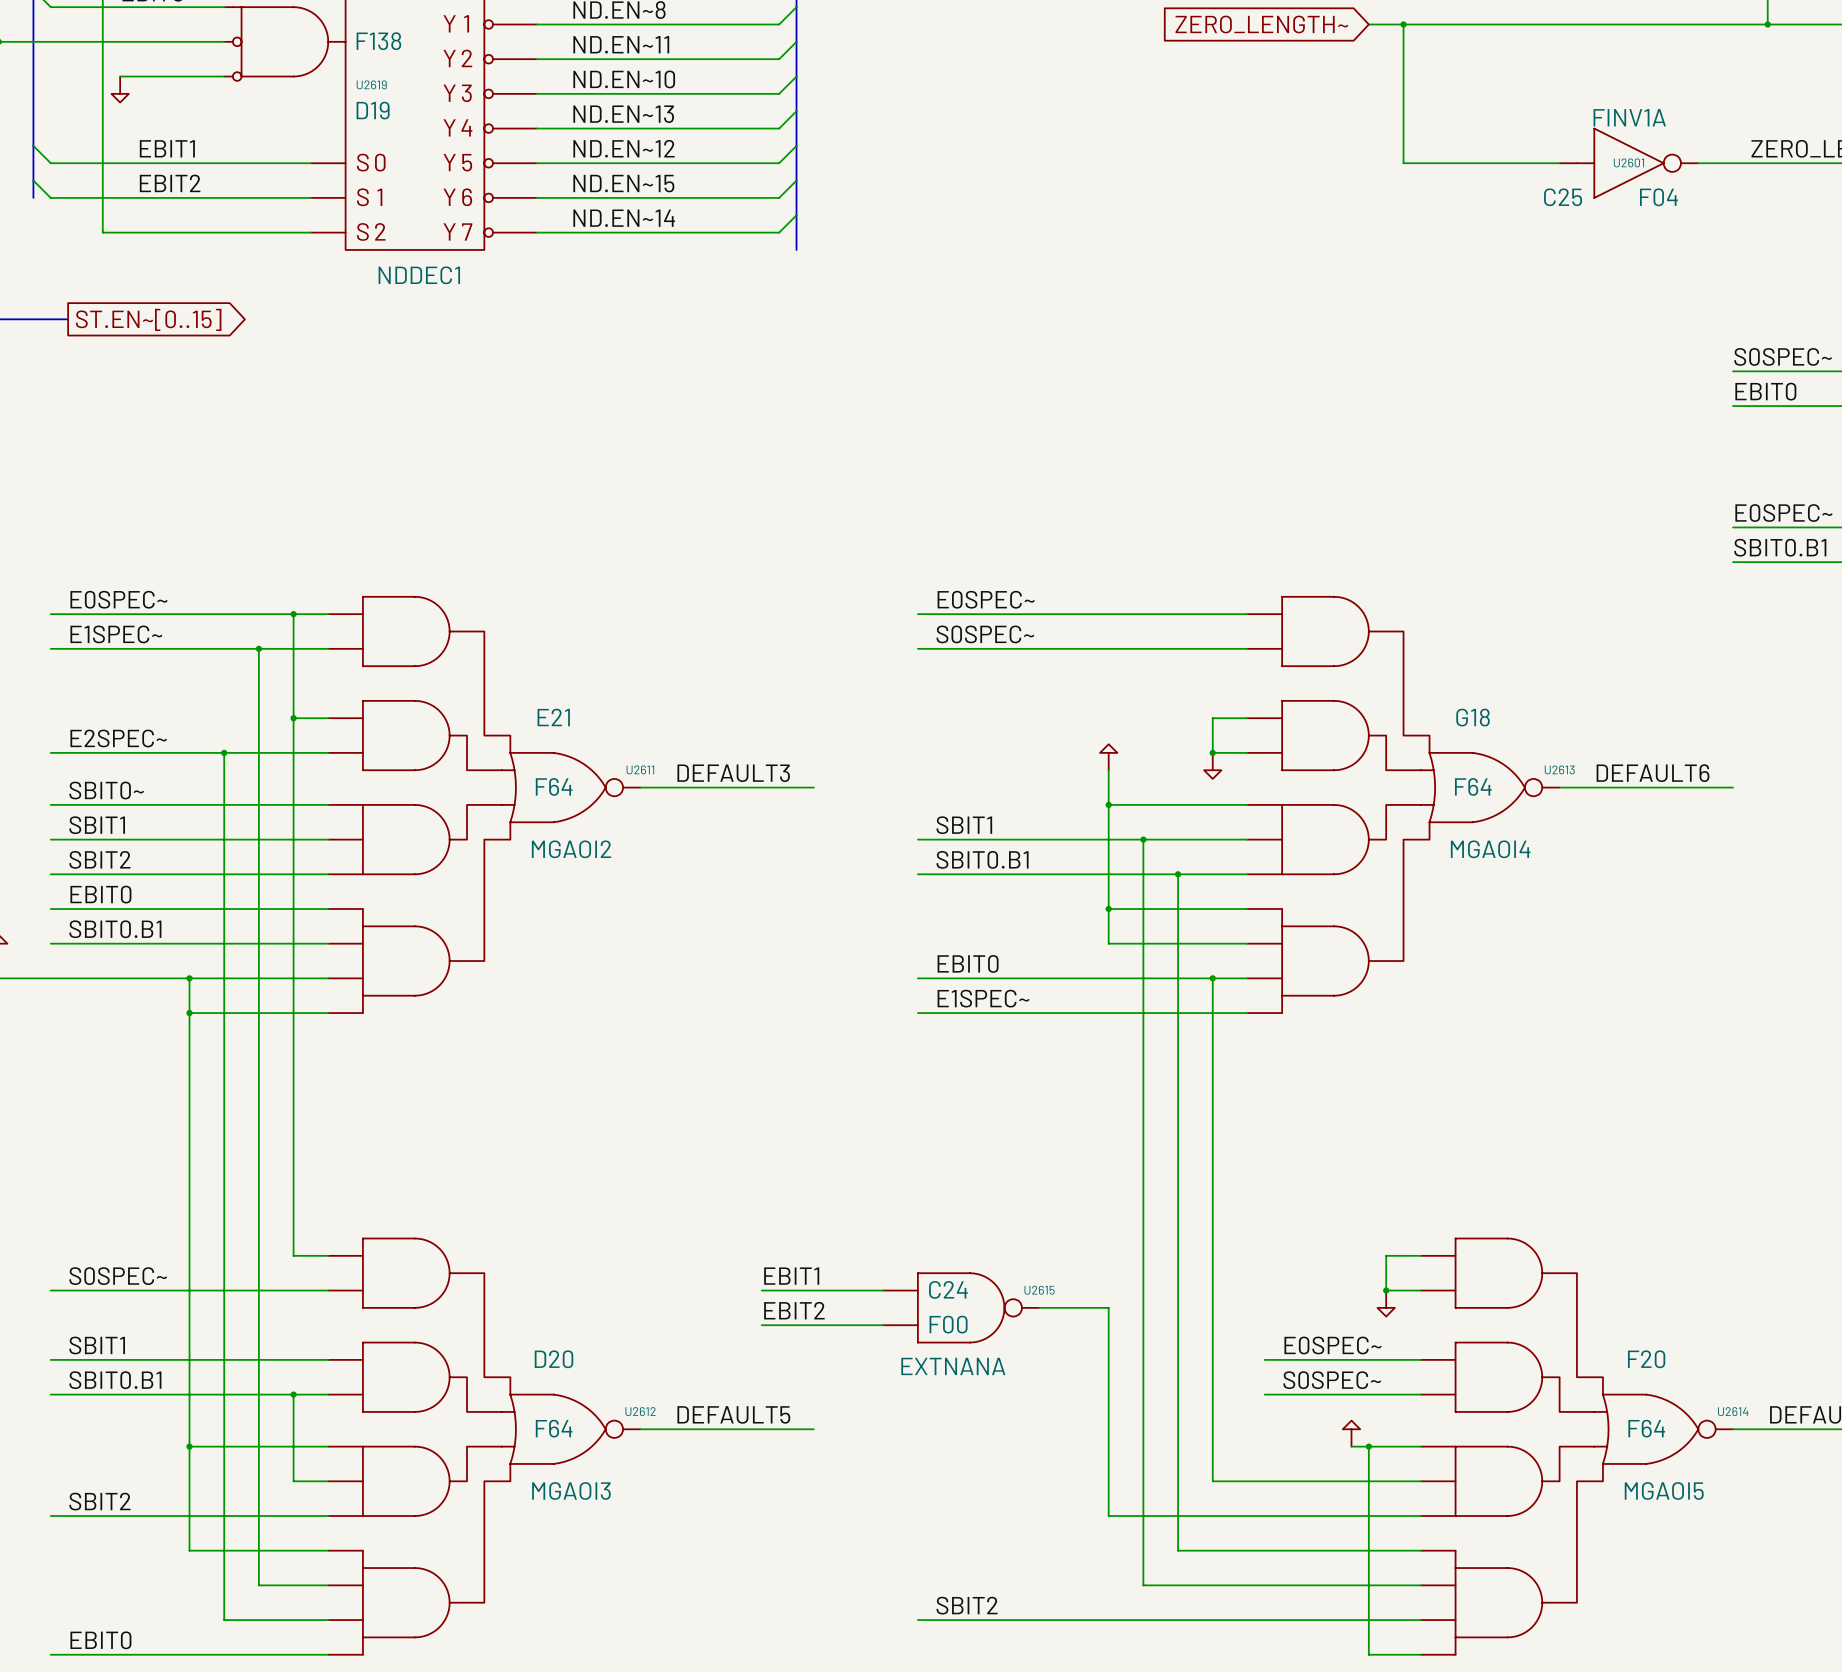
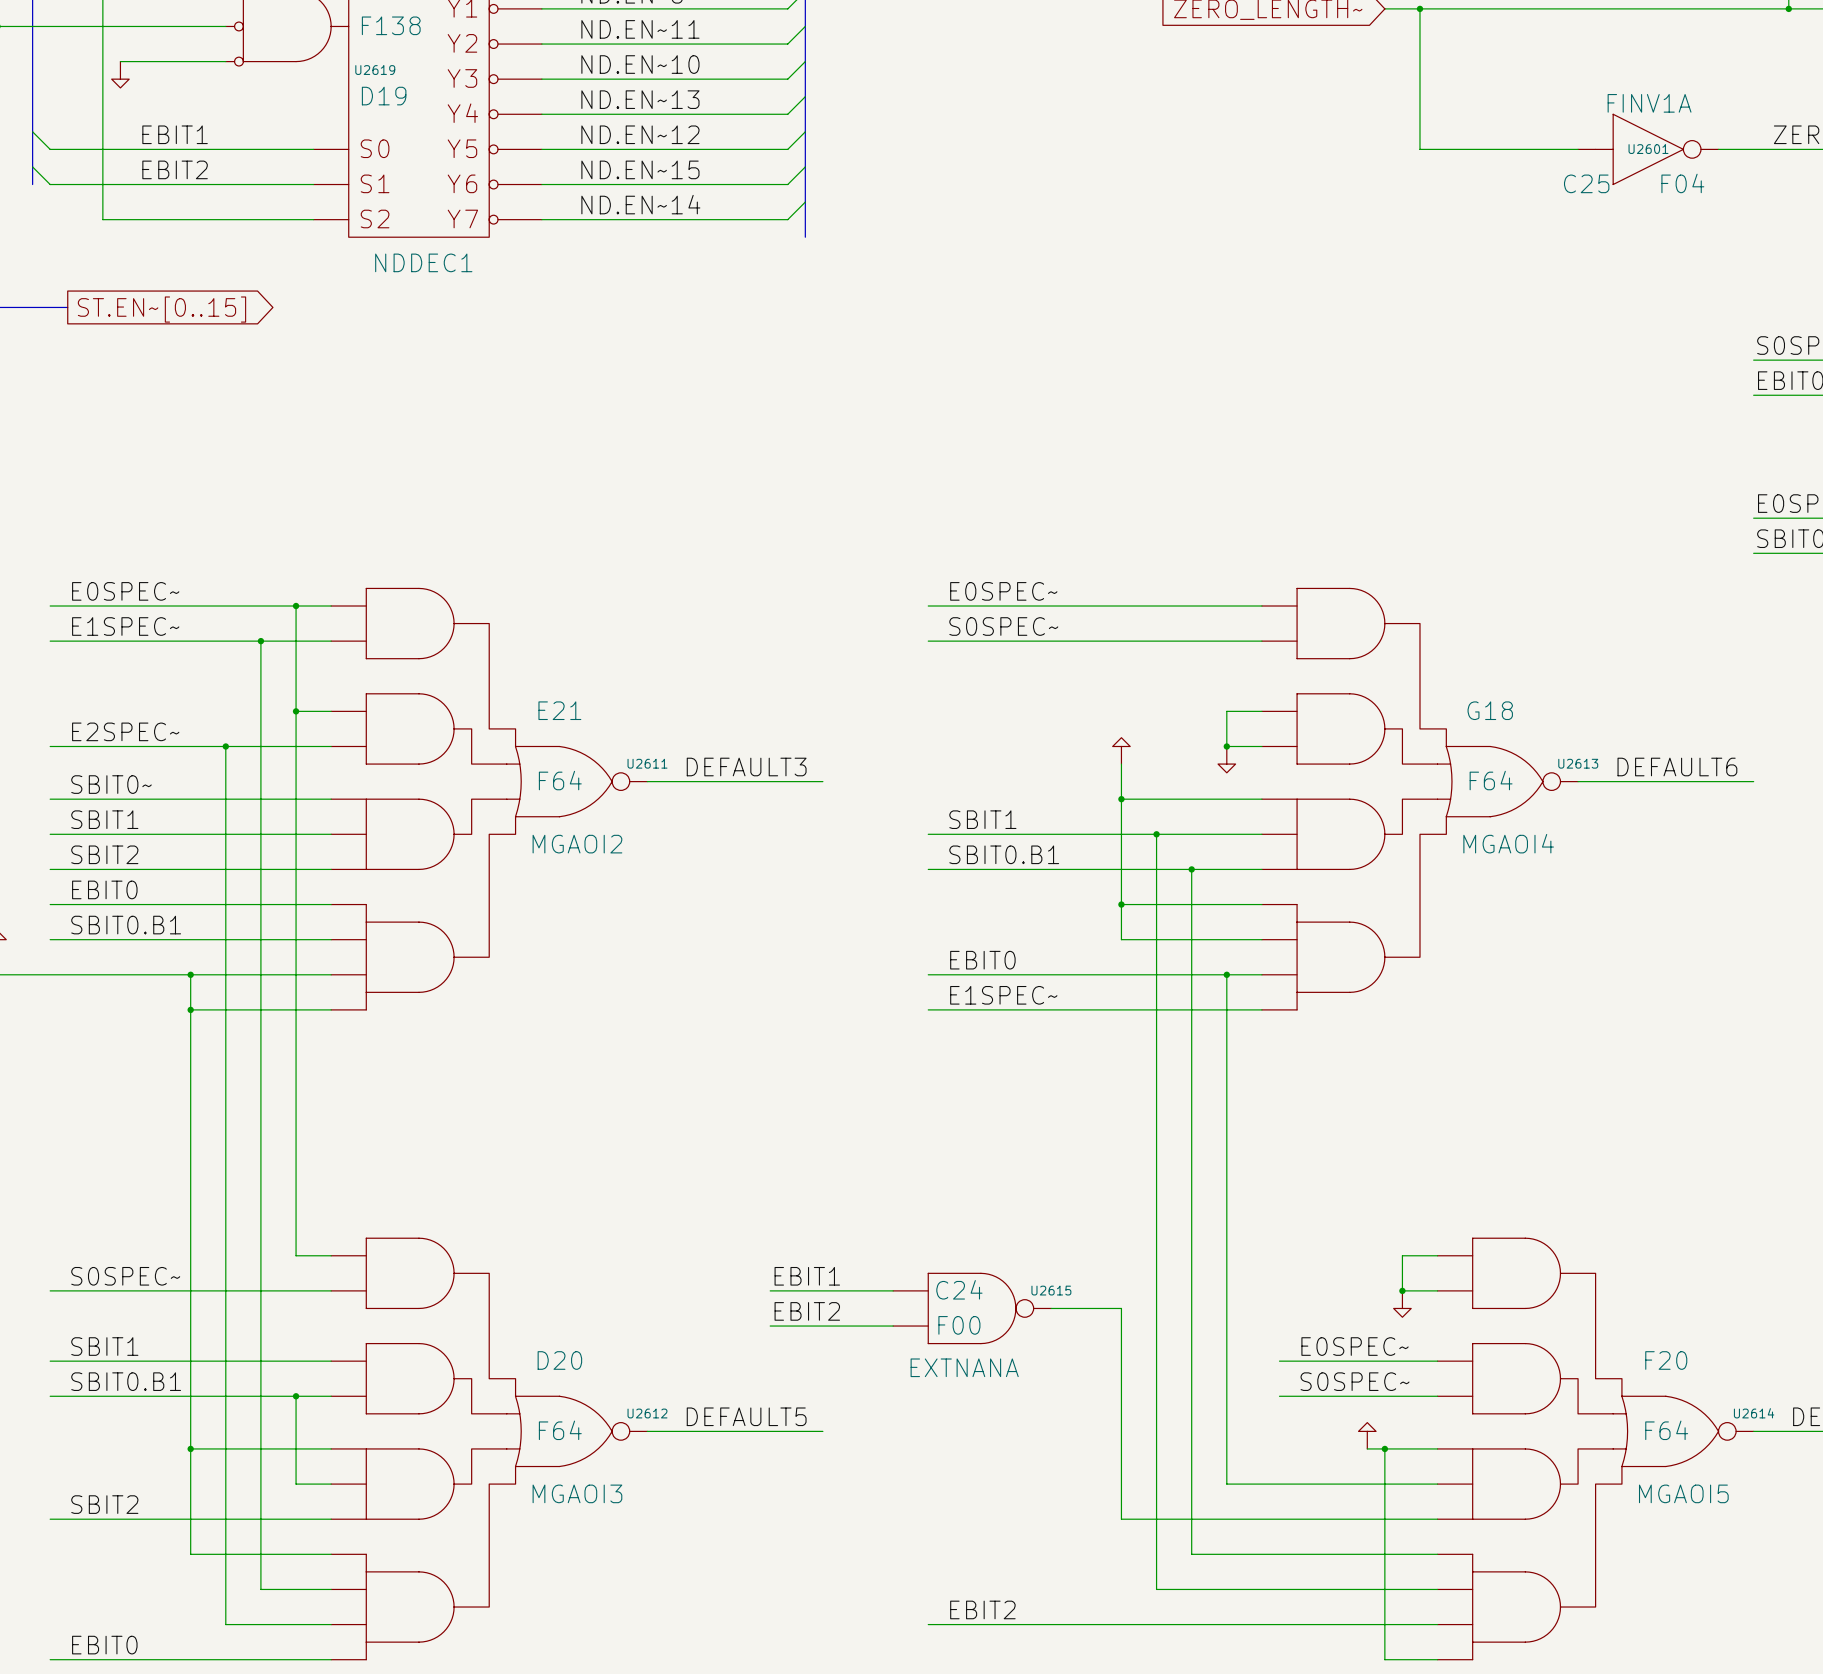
label: SBIT2 (967, 1605) -> EBIT2 (982, 1609)

